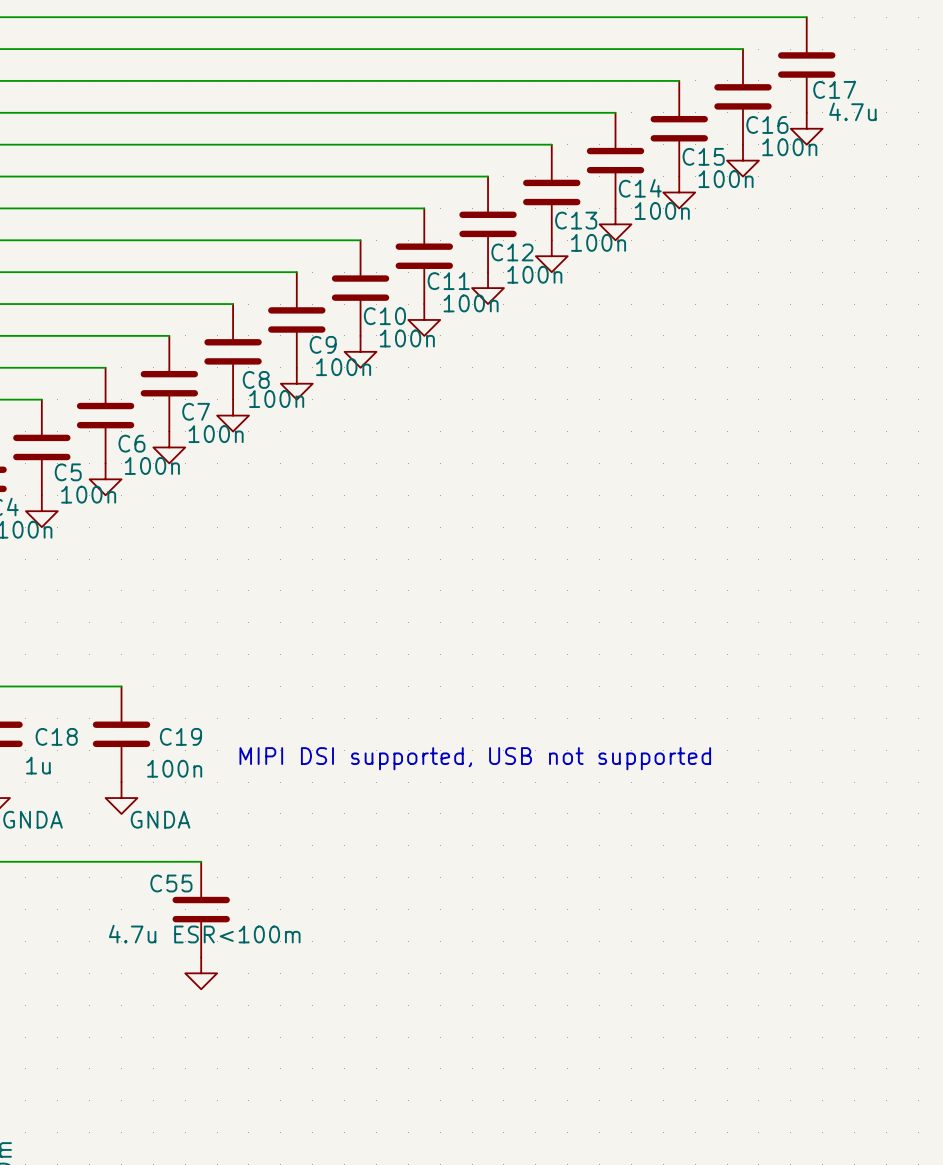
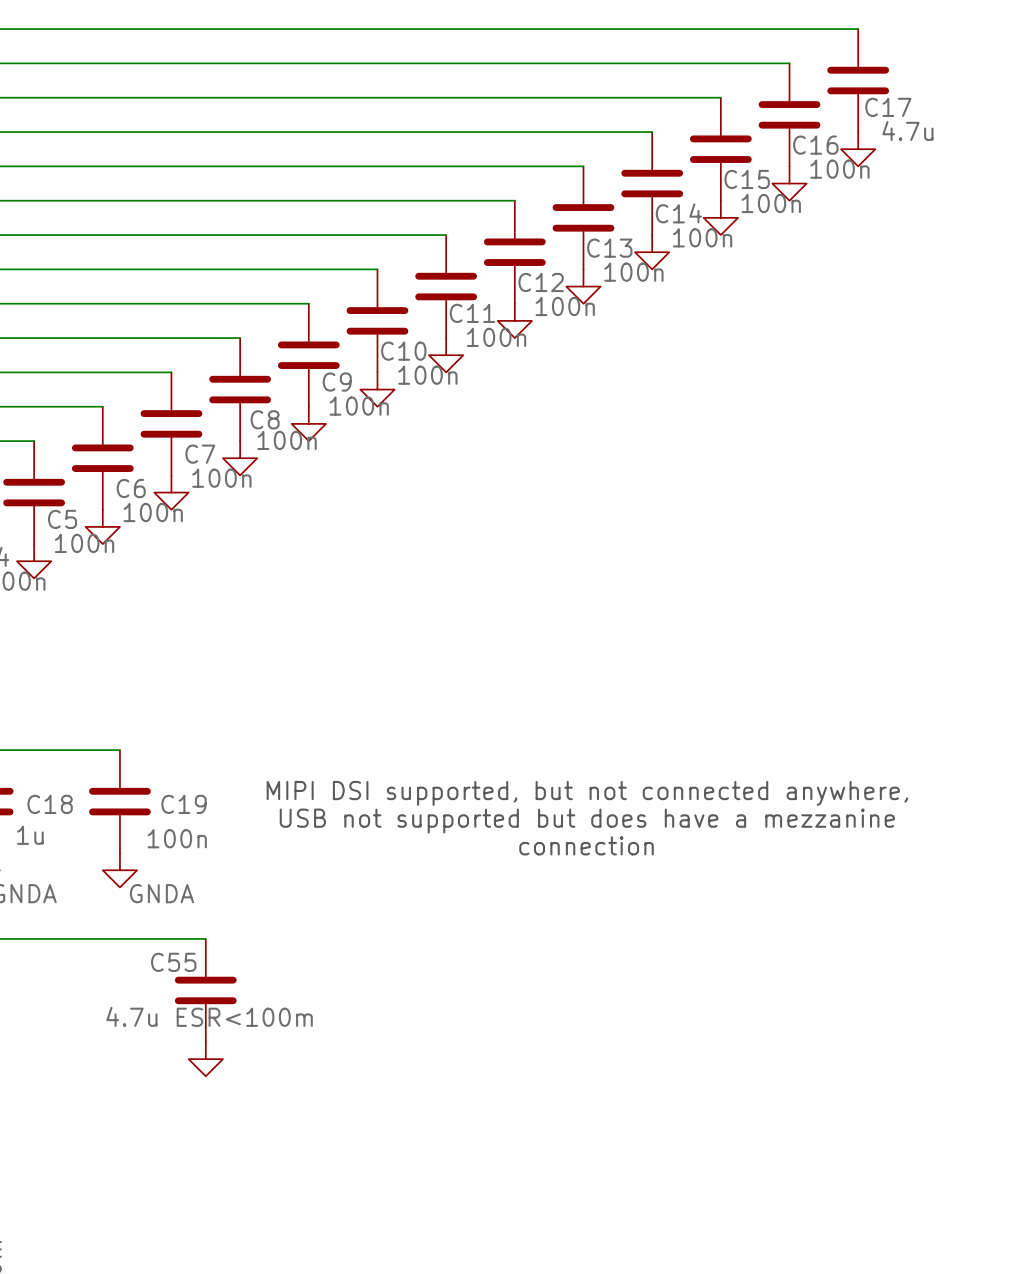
text: none -> USB not supported but does have a mezzanine (587, 821)
text: MIPI DSI supported, USB not supported (475, 758) -> MIPI DSI supported, but not connected anywhere, (587, 793)
text: none -> connection (586, 845)

